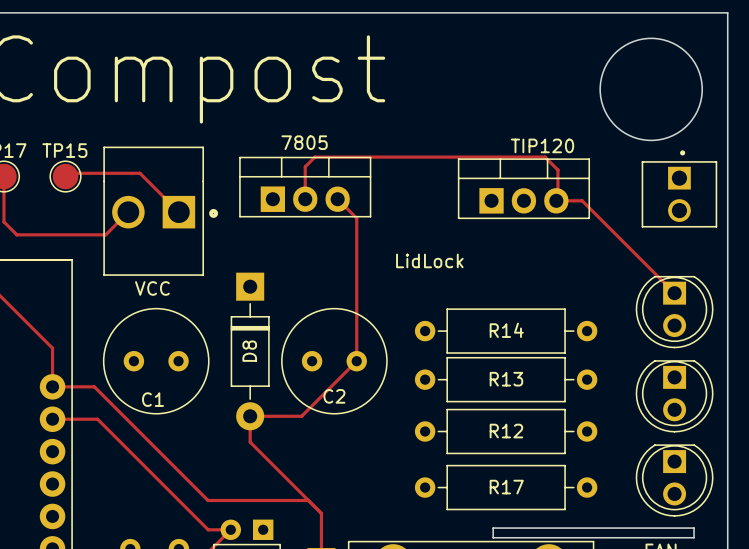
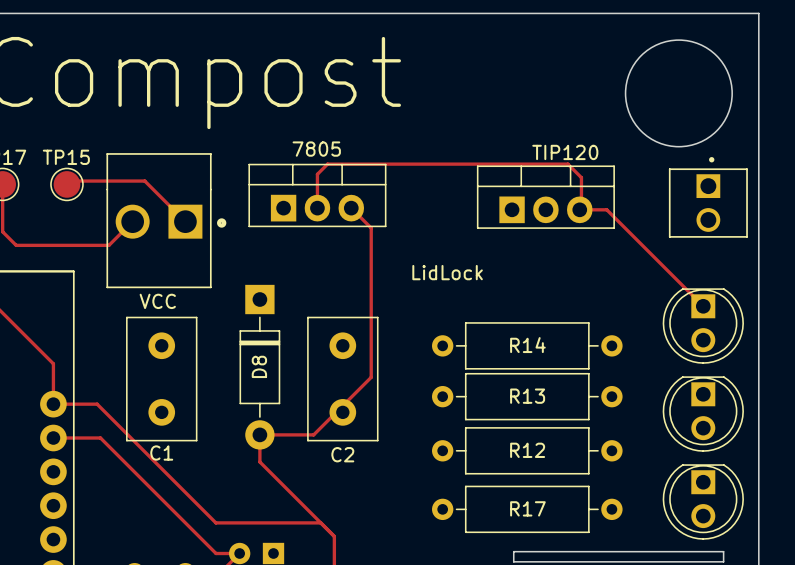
C1 footprint: [102, 307, 210, 415] -> [126, 316, 198, 442]
C2 footprint: [281, 307, 388, 415] -> [307, 316, 379, 442]
C2 name position: C2 (334, 396) -> C2 (342, 454)
C1 name position: C1 (152, 399) -> C1 (161, 453)

